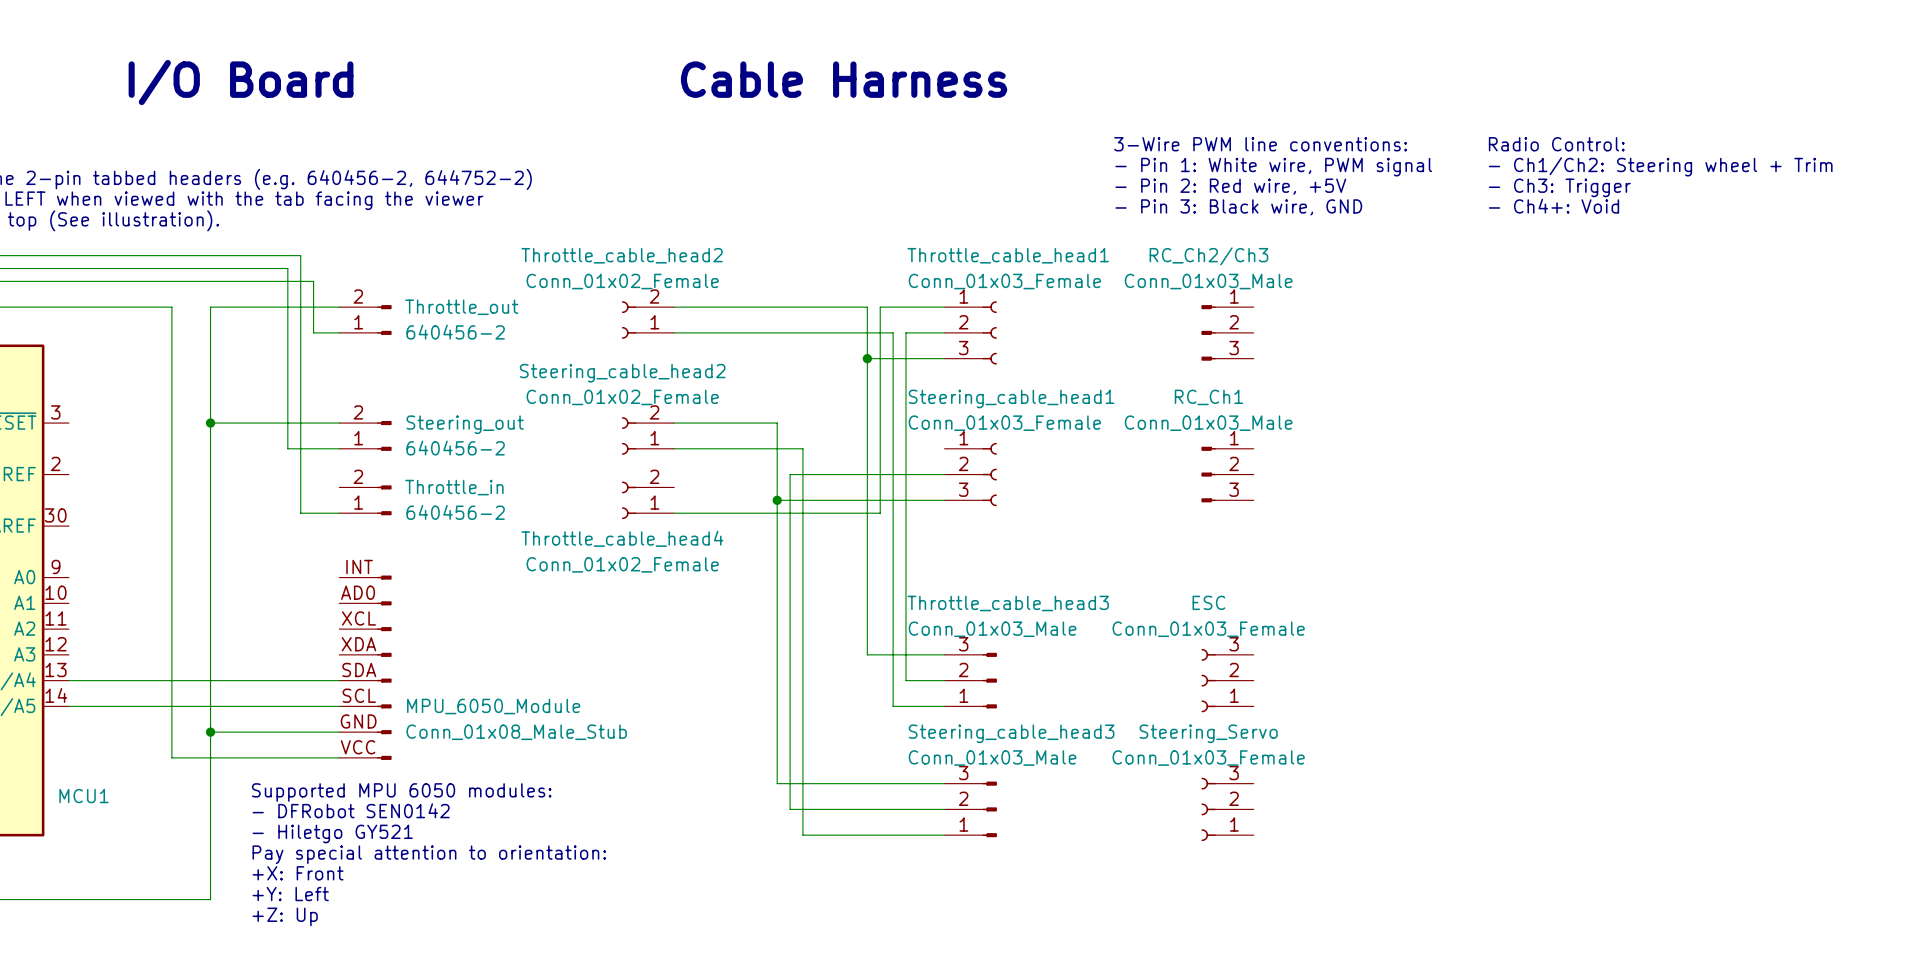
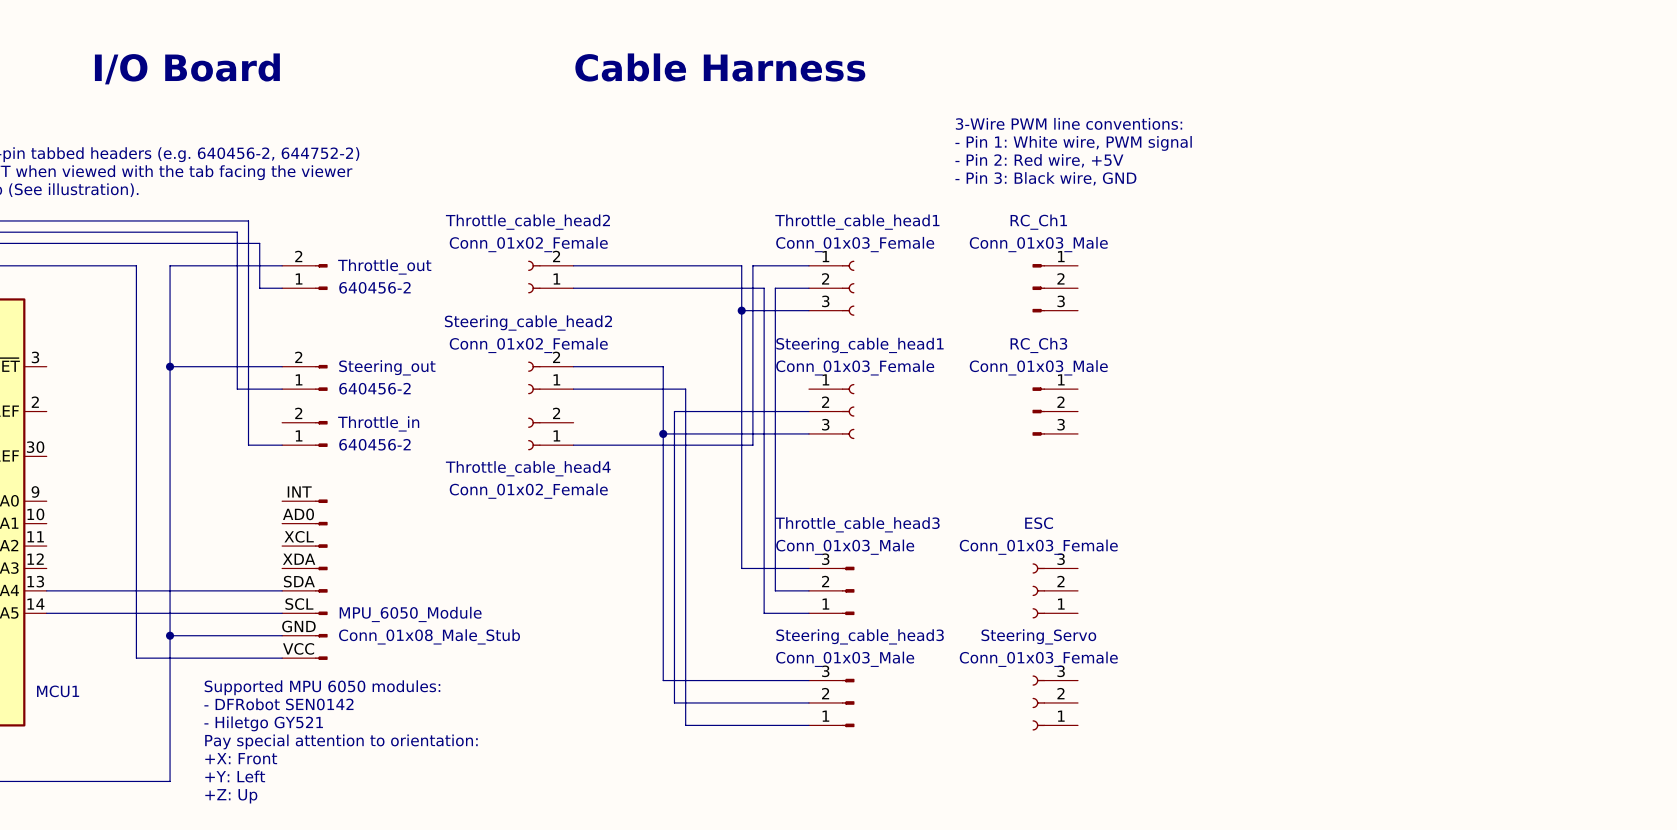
text: Radio Control: (1556, 144) -> none
text: - Ch1/Ch2: Steering wheel + Trim (1660, 166) -> none
text: - Ch3: Trigger (1559, 187) -> none
text: - Ch4+: Void (1553, 206) -> none
RC_Ch2/Ch3 name: RC_Ch2/Ch3 (1208, 256) -> RC_Ch1 (1038, 222)
RC_Ch1 name: RC_Ch1 (1208, 397) -> RC_Ch3 (1038, 345)

